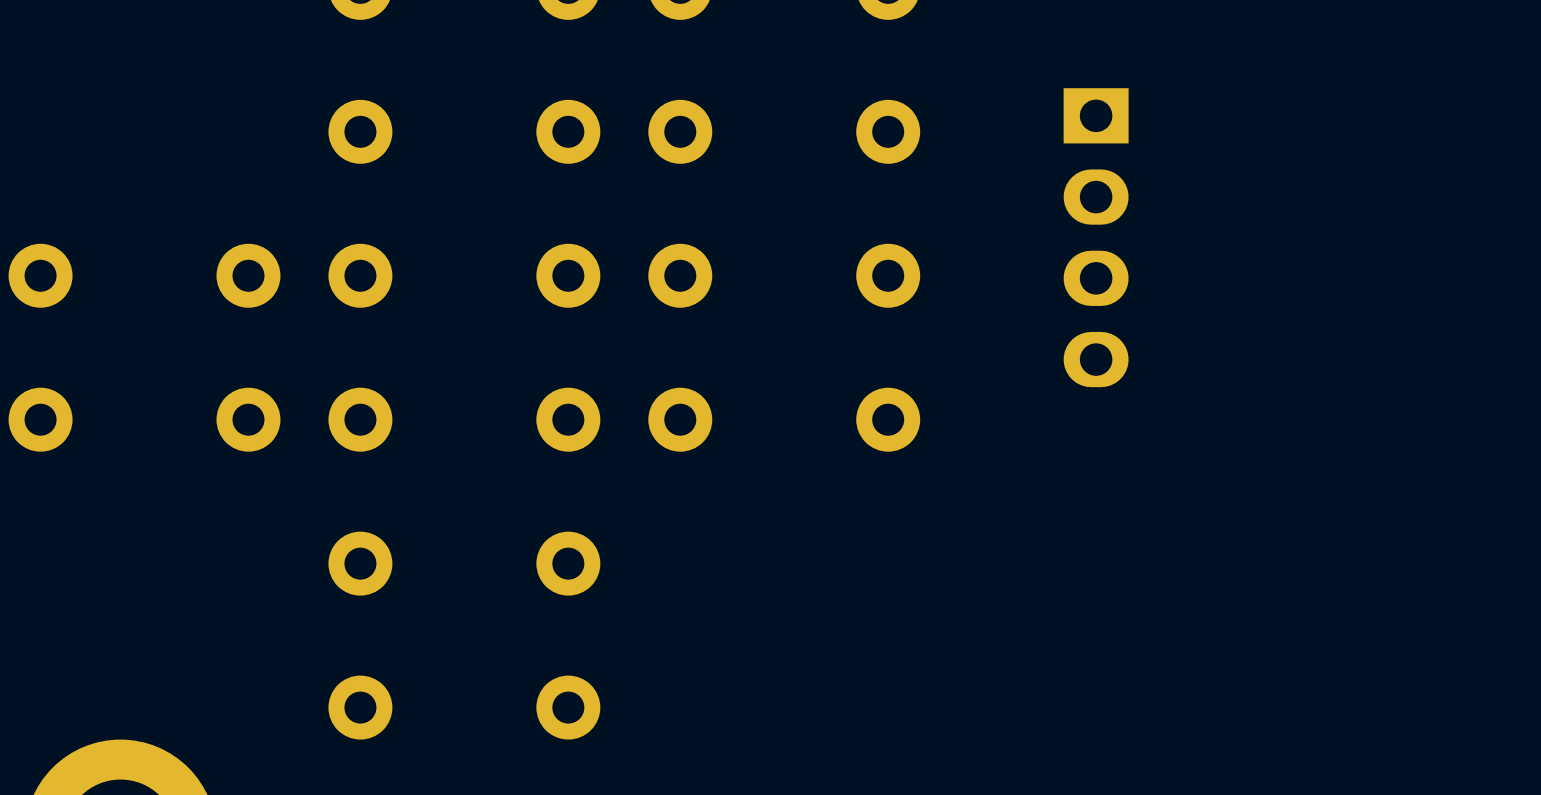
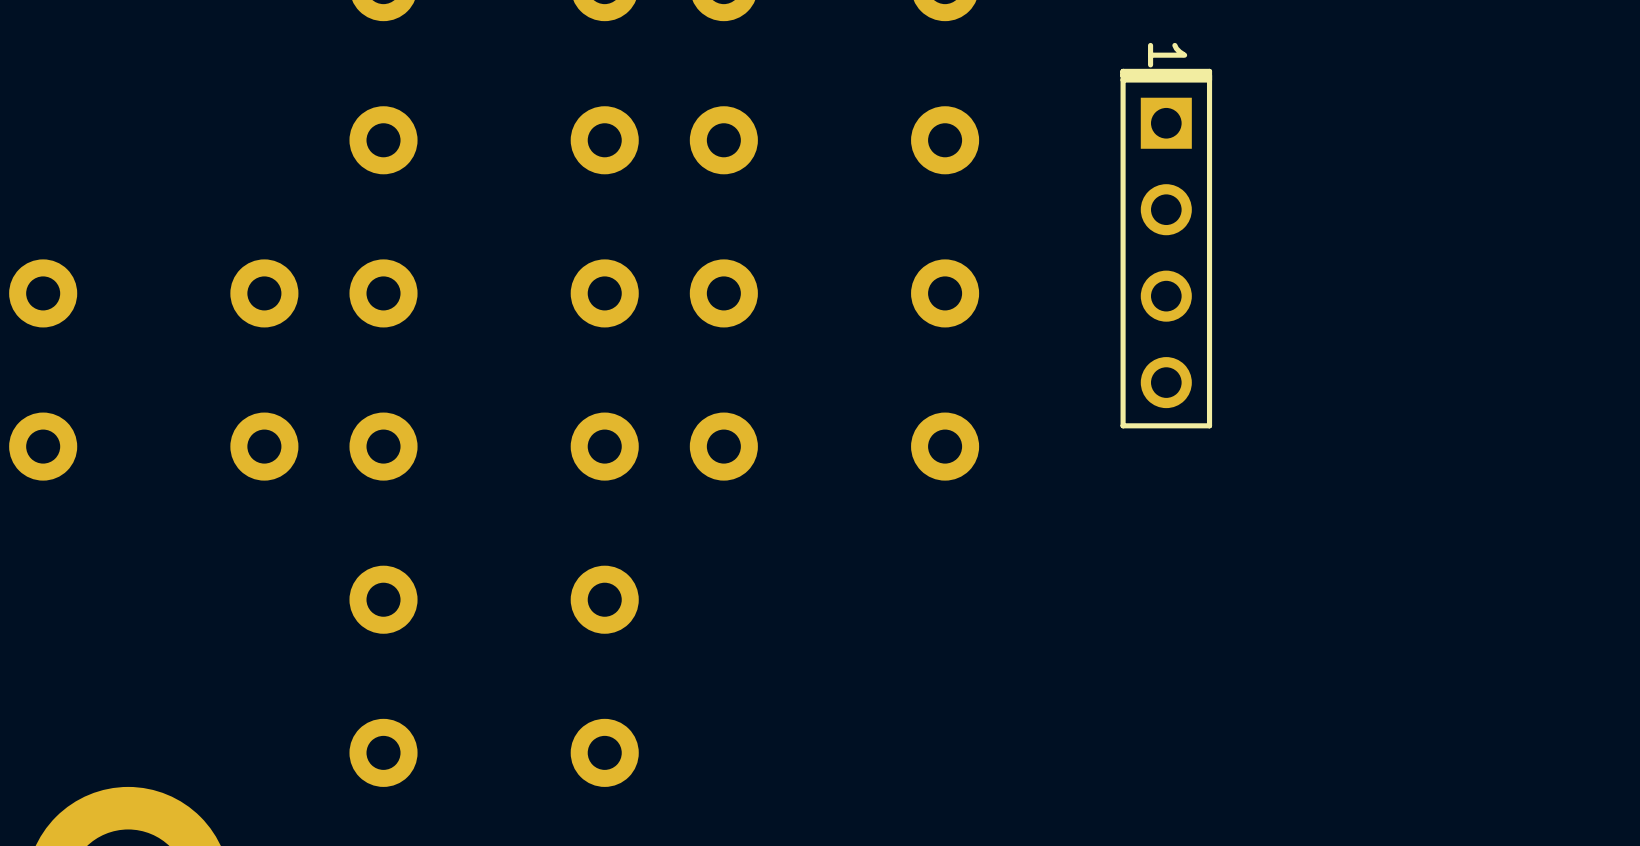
part footprint: [1063, 88, 1129, 388] -> [1120, 68, 1213, 429]

